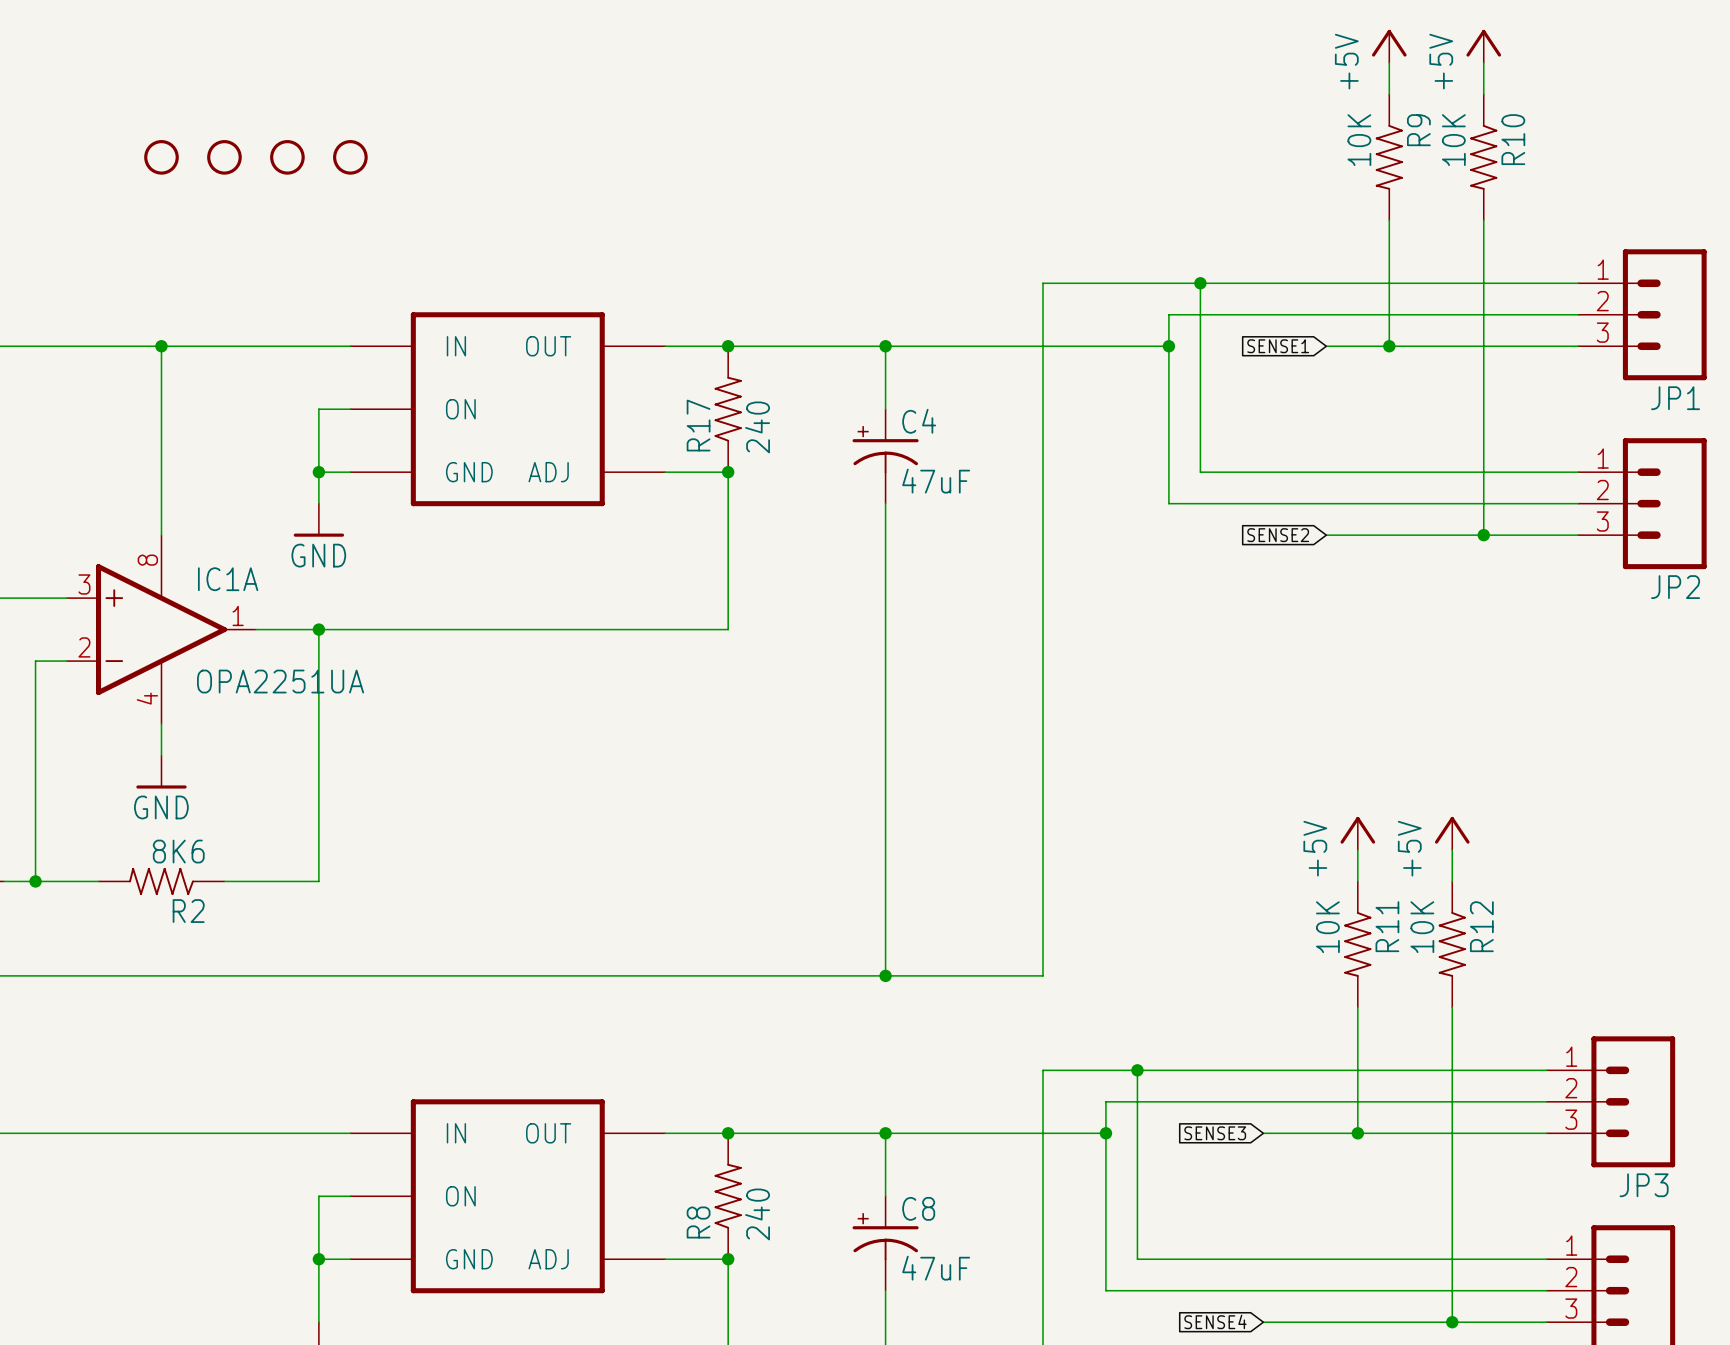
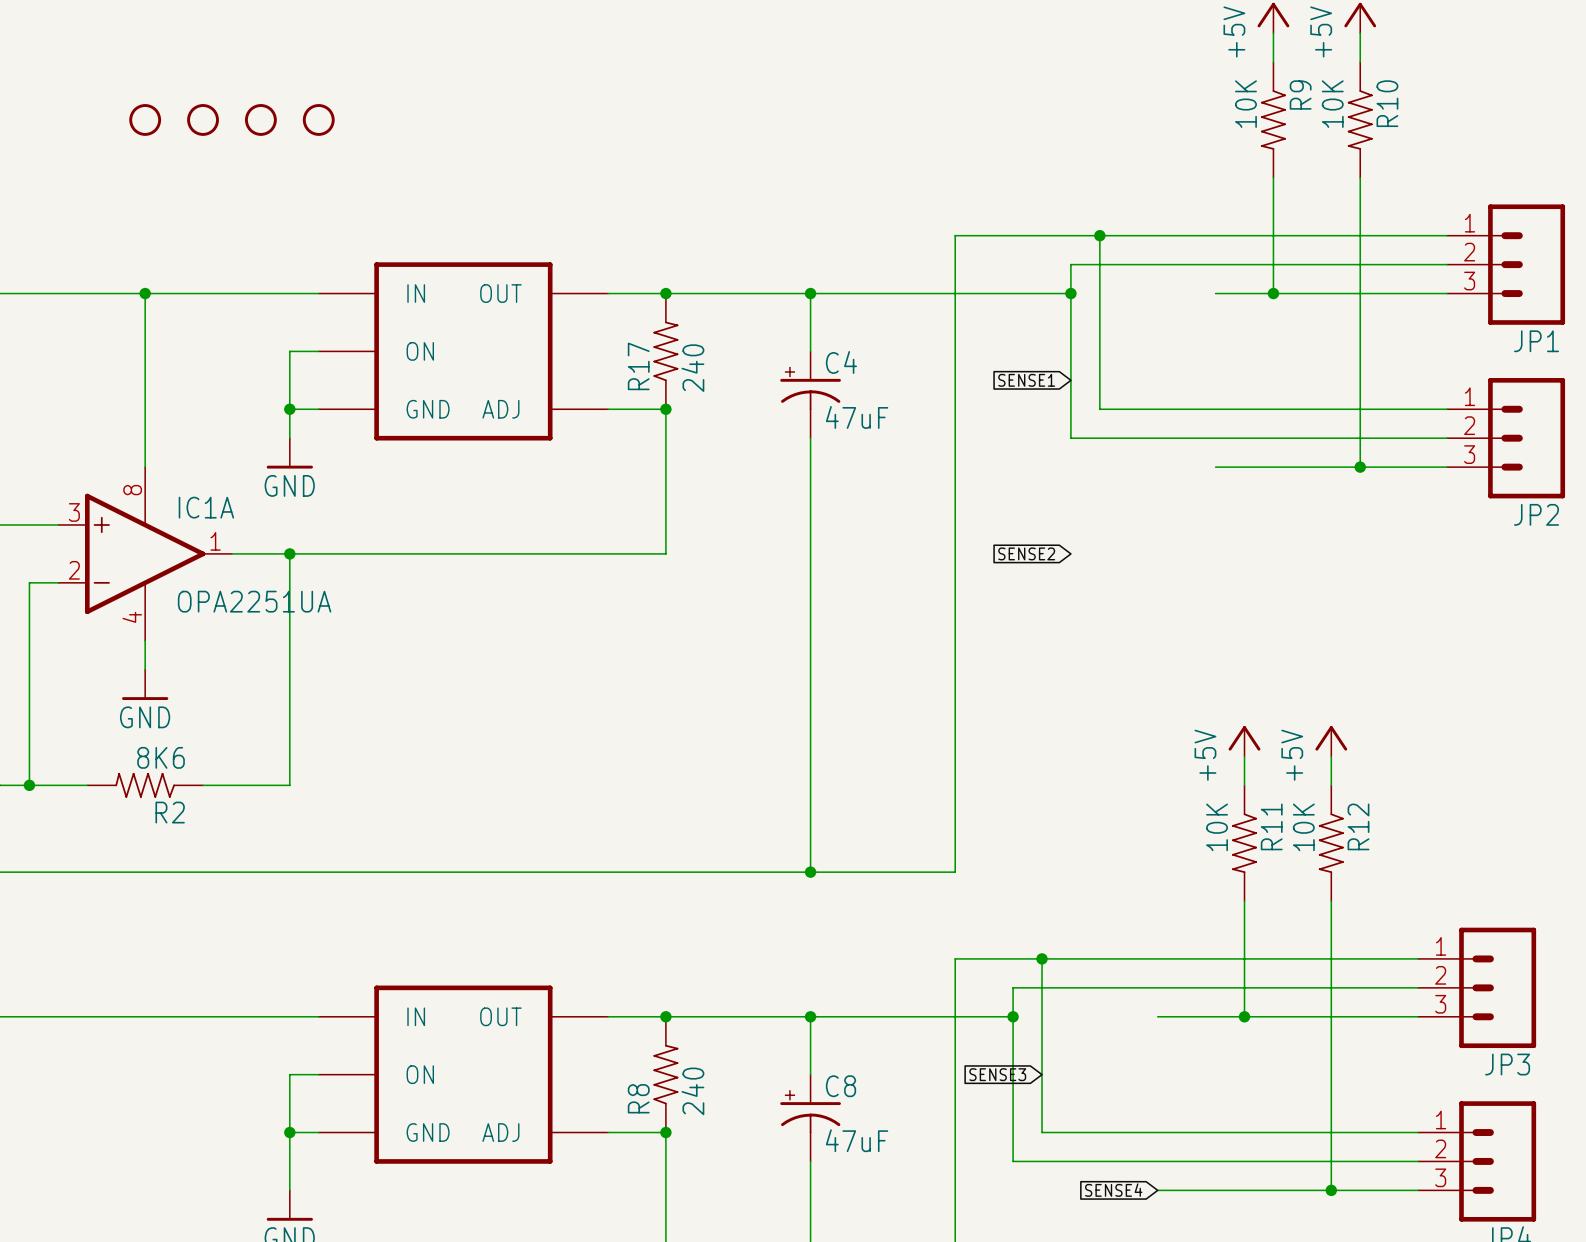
global label position: SENSE1 (1278, 346) -> SENSE1 (1026, 380)
global label position: SENSE2 (1278, 535) -> SENSE2 (1026, 553)
global label position: SENSE3 (1215, 1133) -> SENSE3 (997, 1074)

